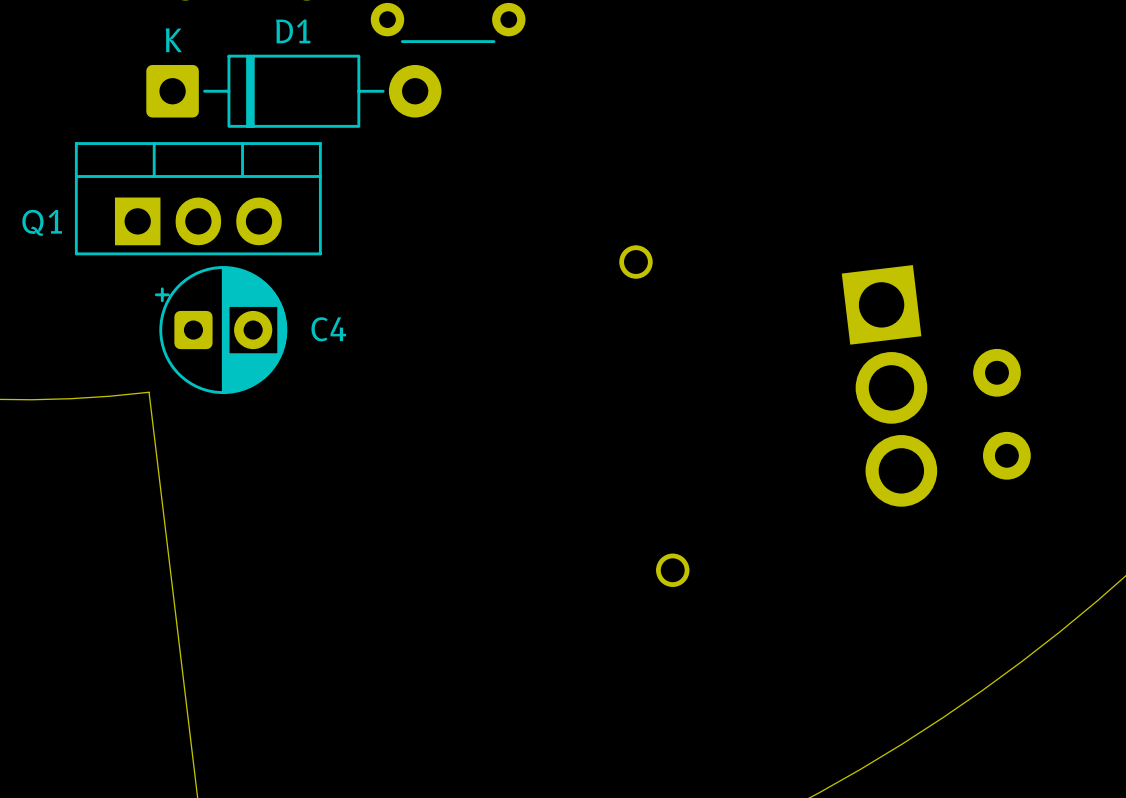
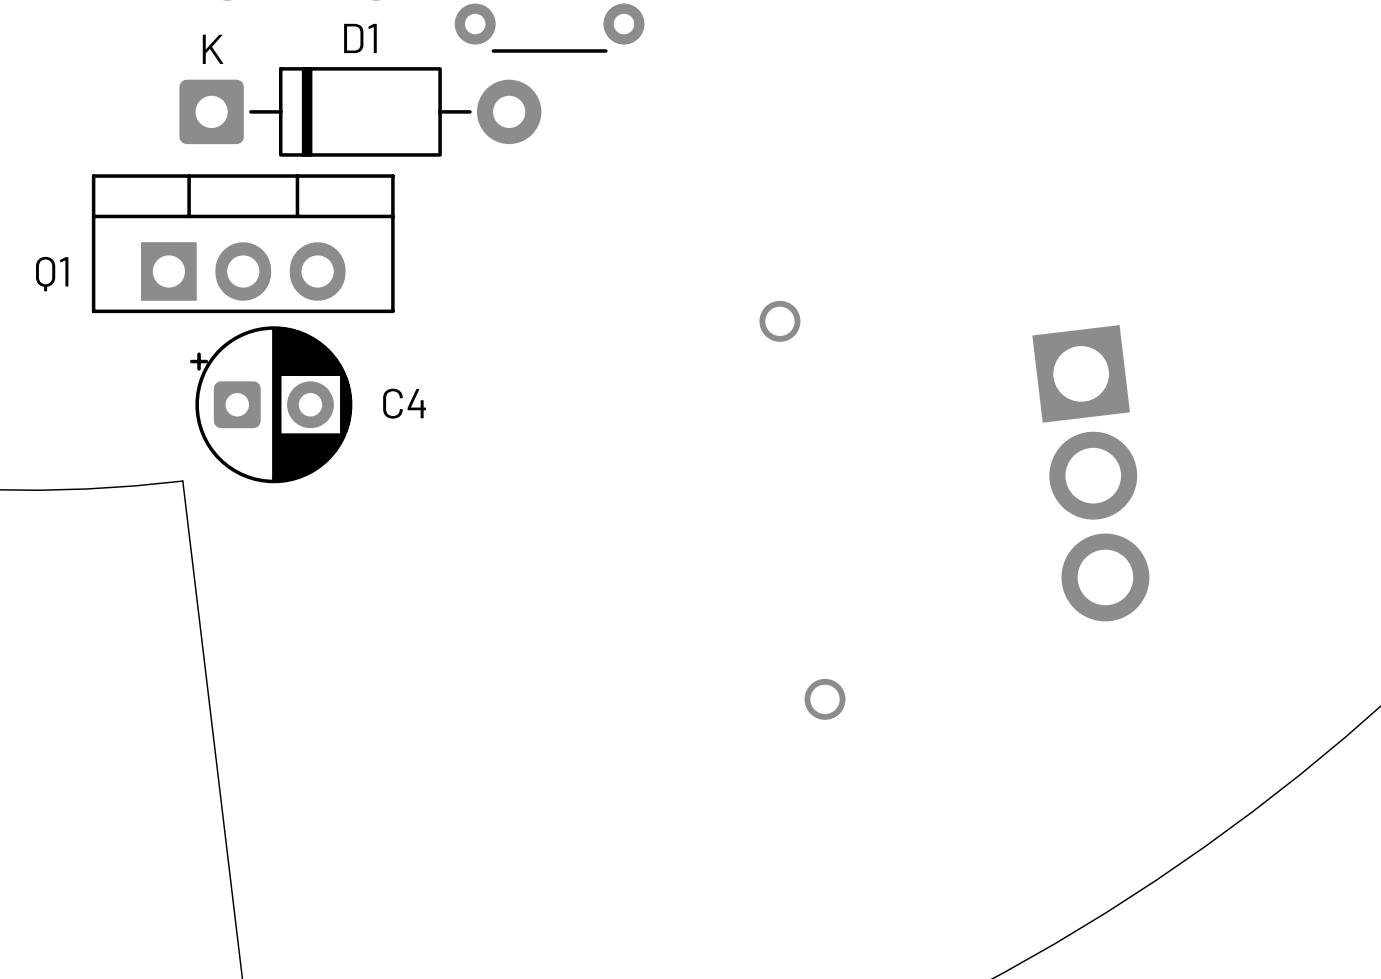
part: (996, 372) -> none
part: (1006, 455) -> none

